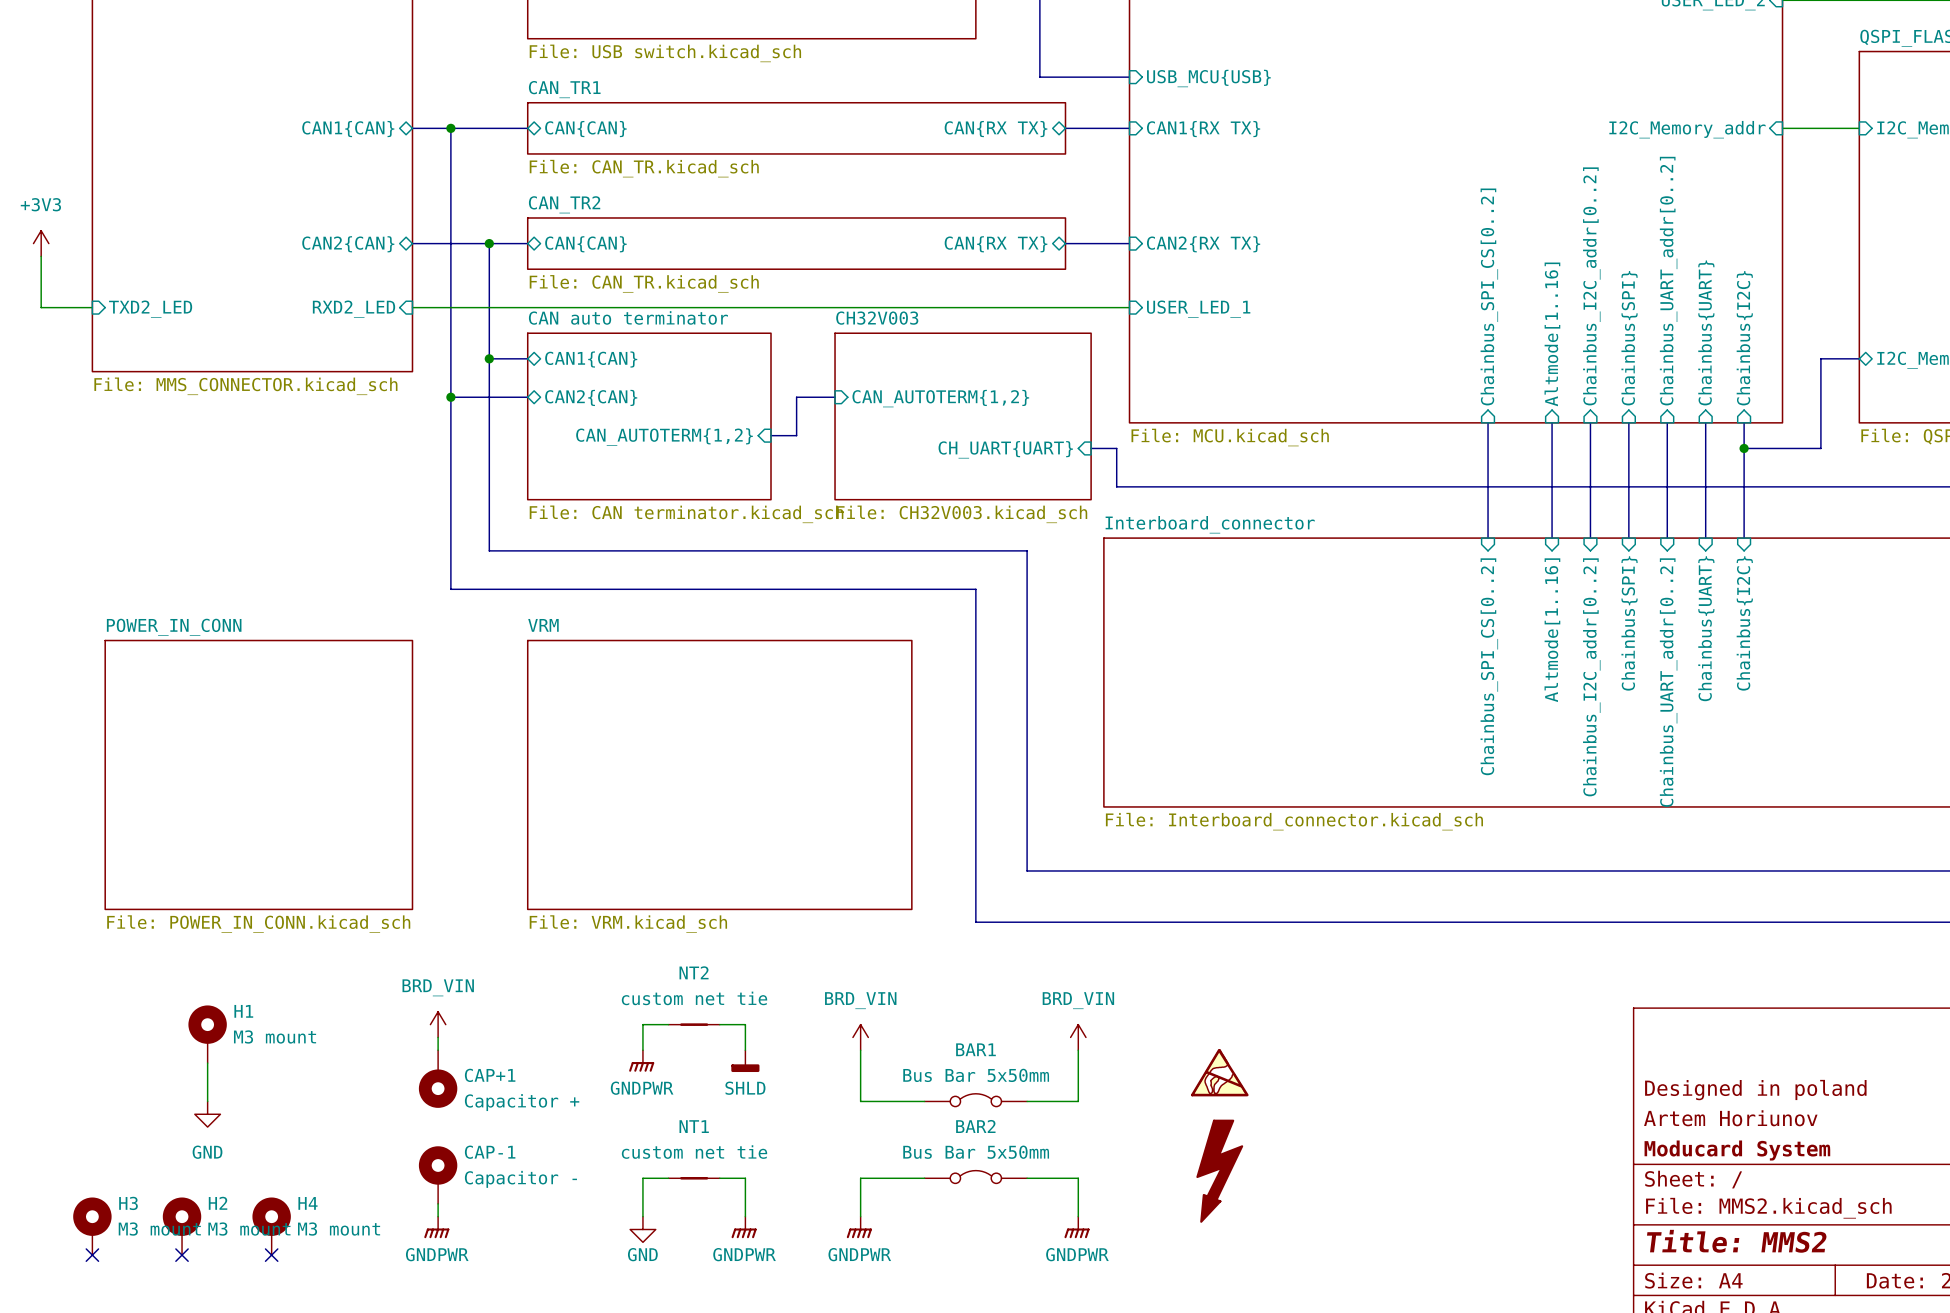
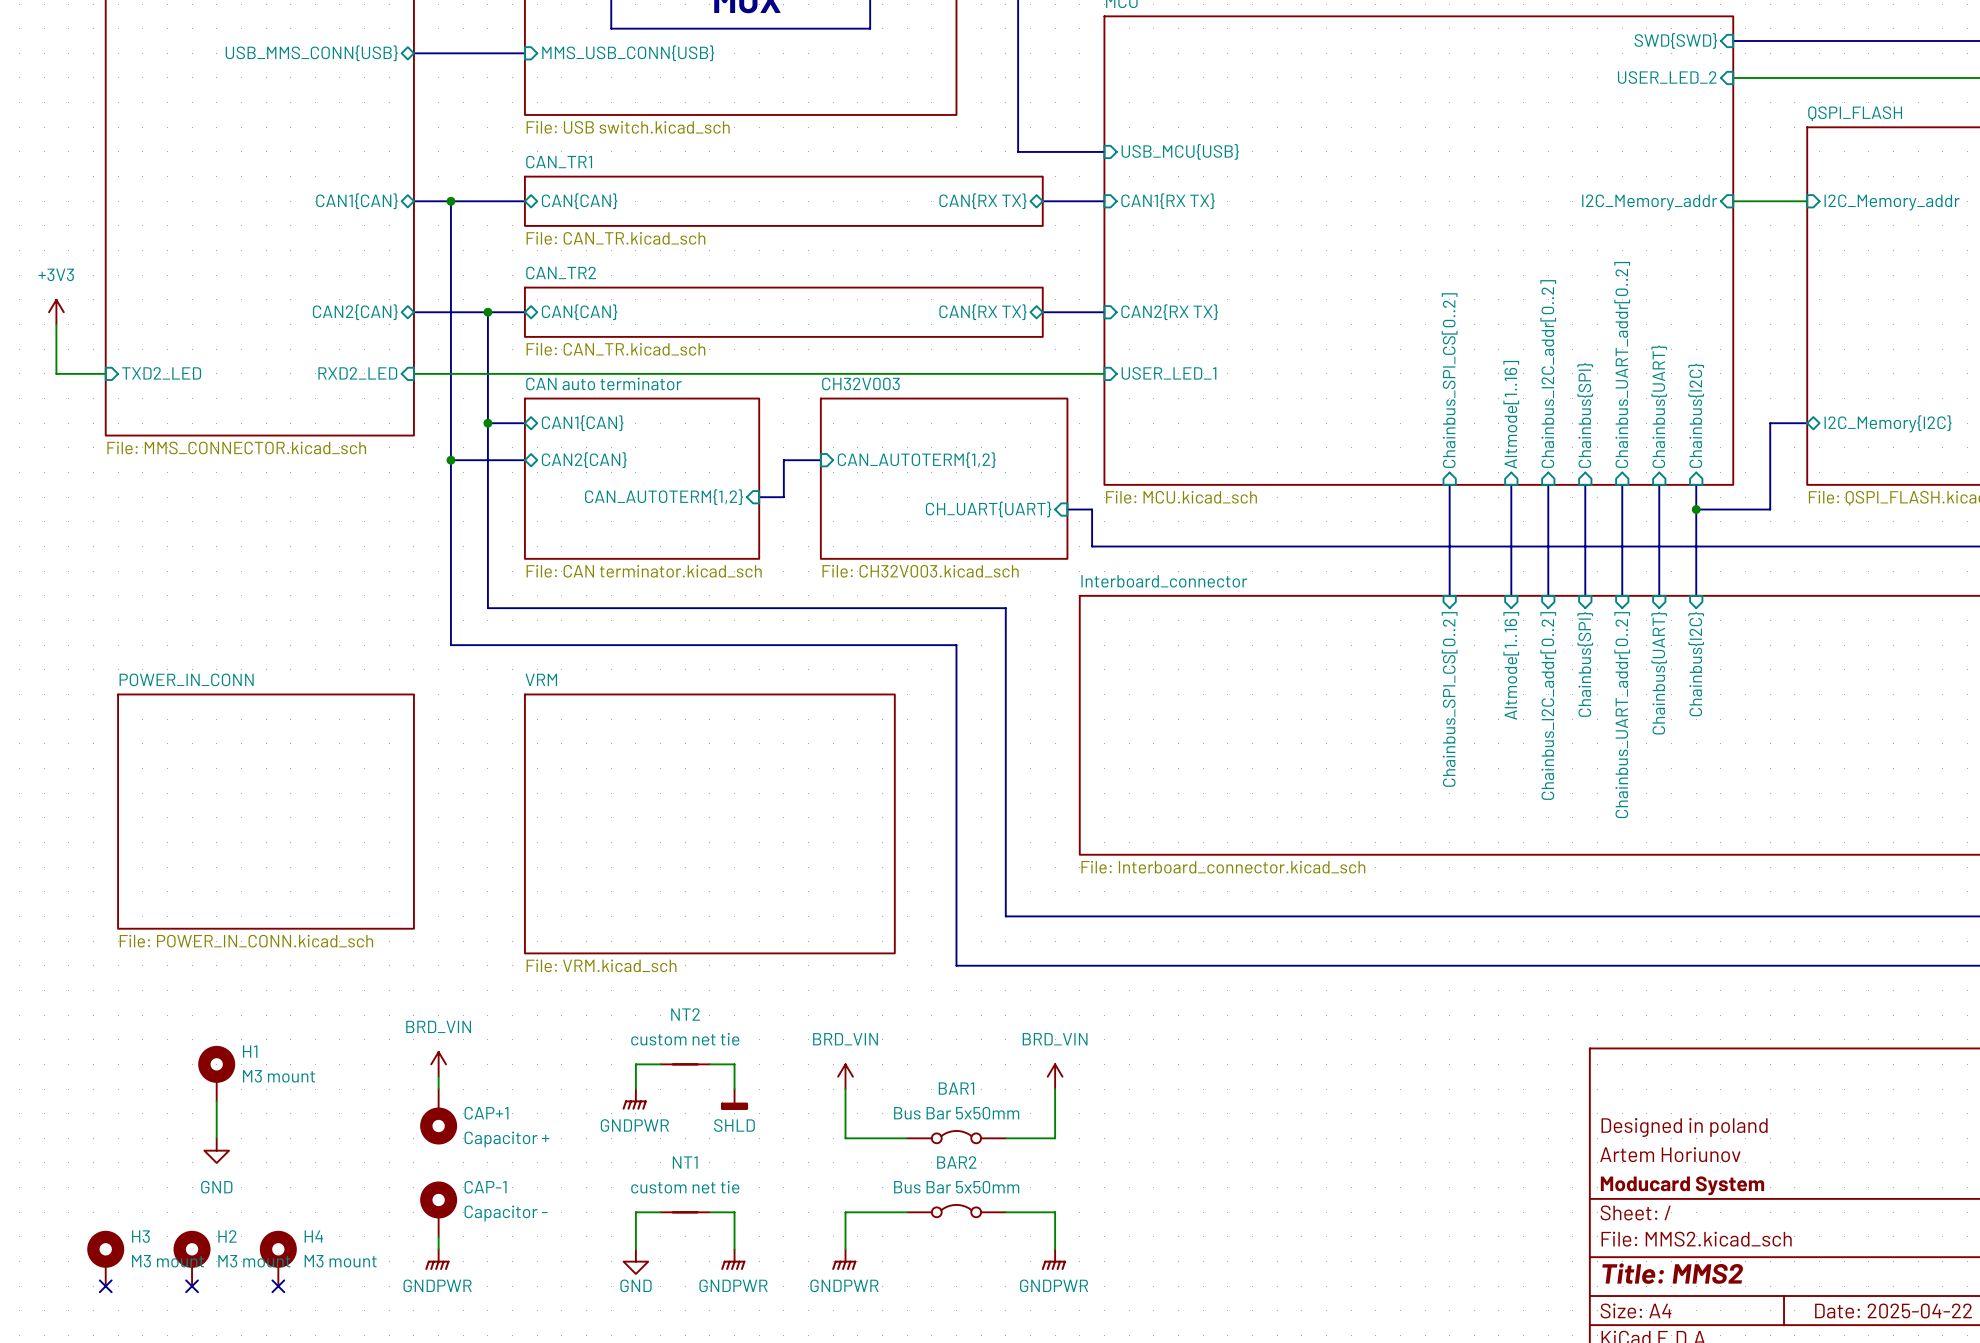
sheet POWER_IN_CONN: none -> File: POWER_IN_CONN.kicad_sch (266, 811)
sheet POWER_IN_CONN: File: POWER_IN_CONN.kicad_sch (258, 774) -> none
power symbol: (1219, 1072) -> none
power symbol: (1219, 1171) -> none

